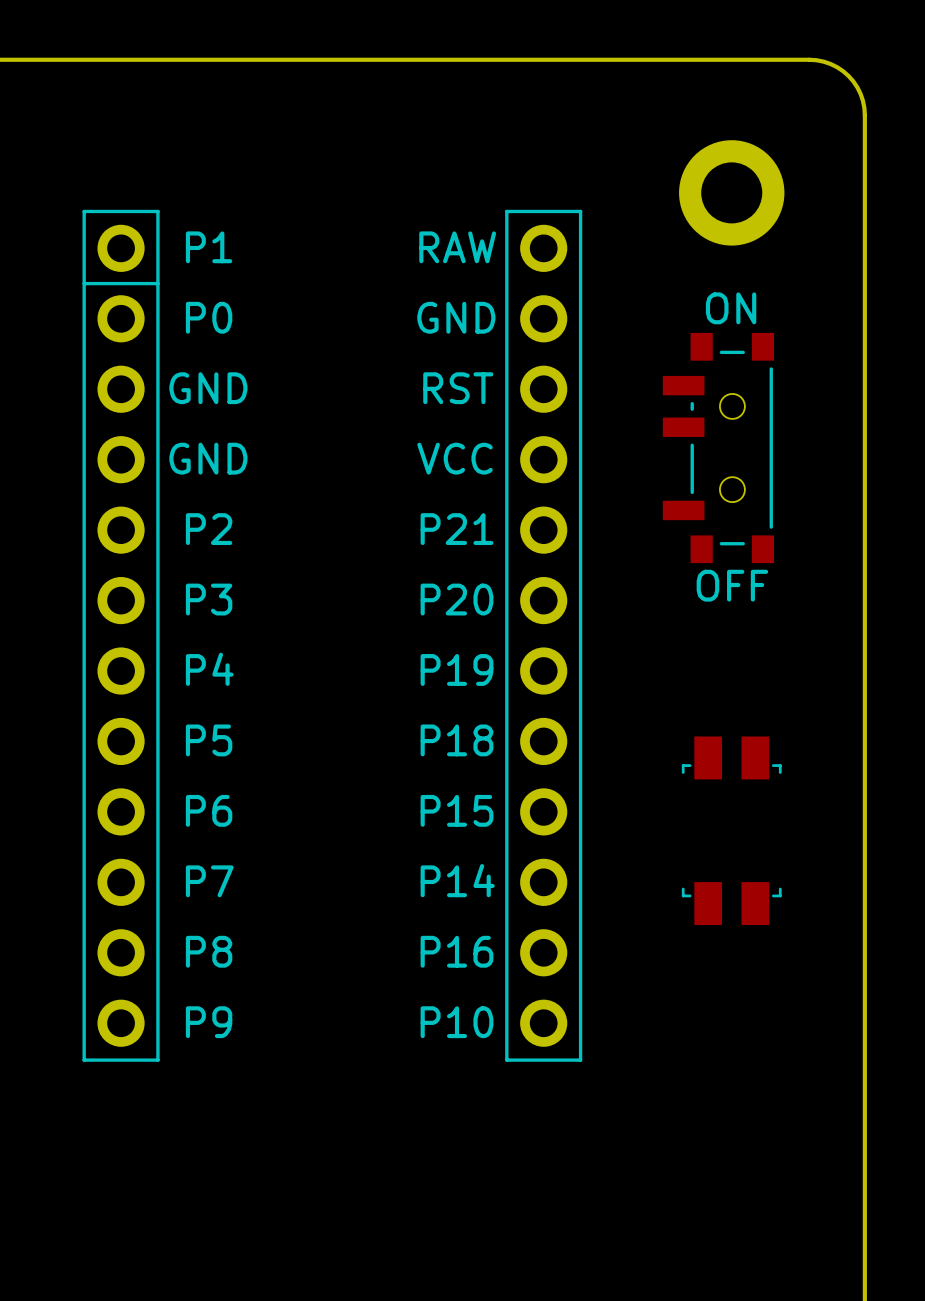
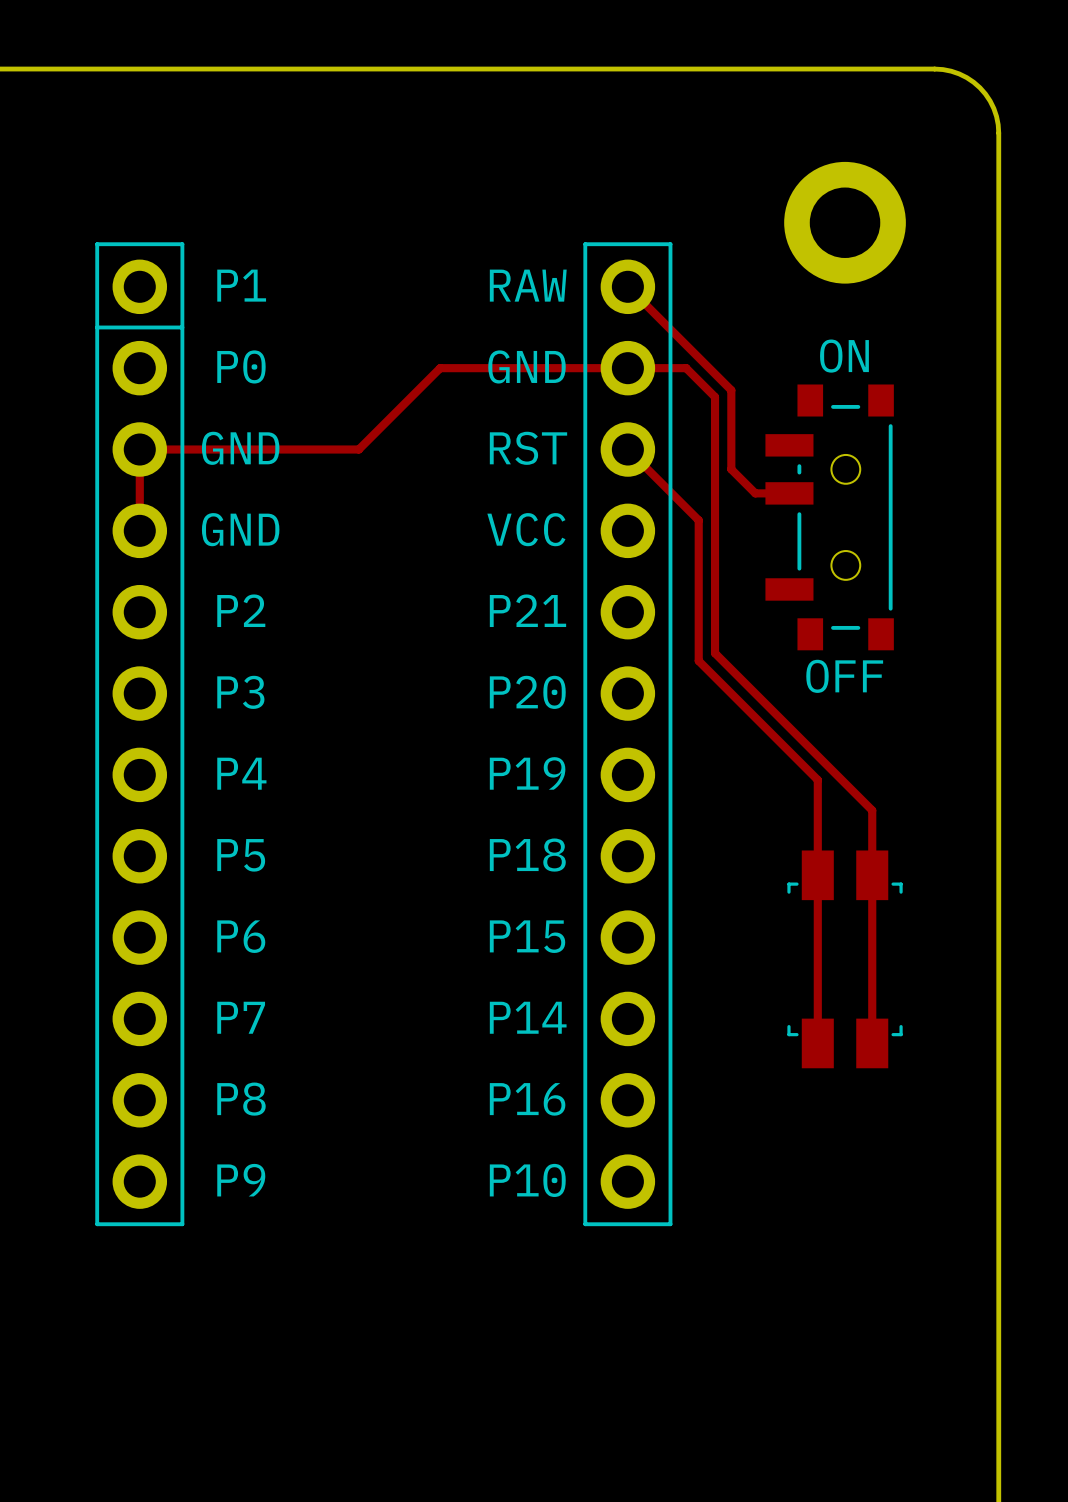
top track: none -> (627, 286) (731, 390) (731, 469) (755, 493) (789, 493)
top track: none -> (627, 449) (698, 520) (698, 660) (817, 780) (817, 1043) (821, 1043) (827, 1037)
top track: none -> (139, 530) (139, 449) (358, 449) (440, 368) (686, 368) (715, 397) (715, 653) (872, 810) (872, 1043)

